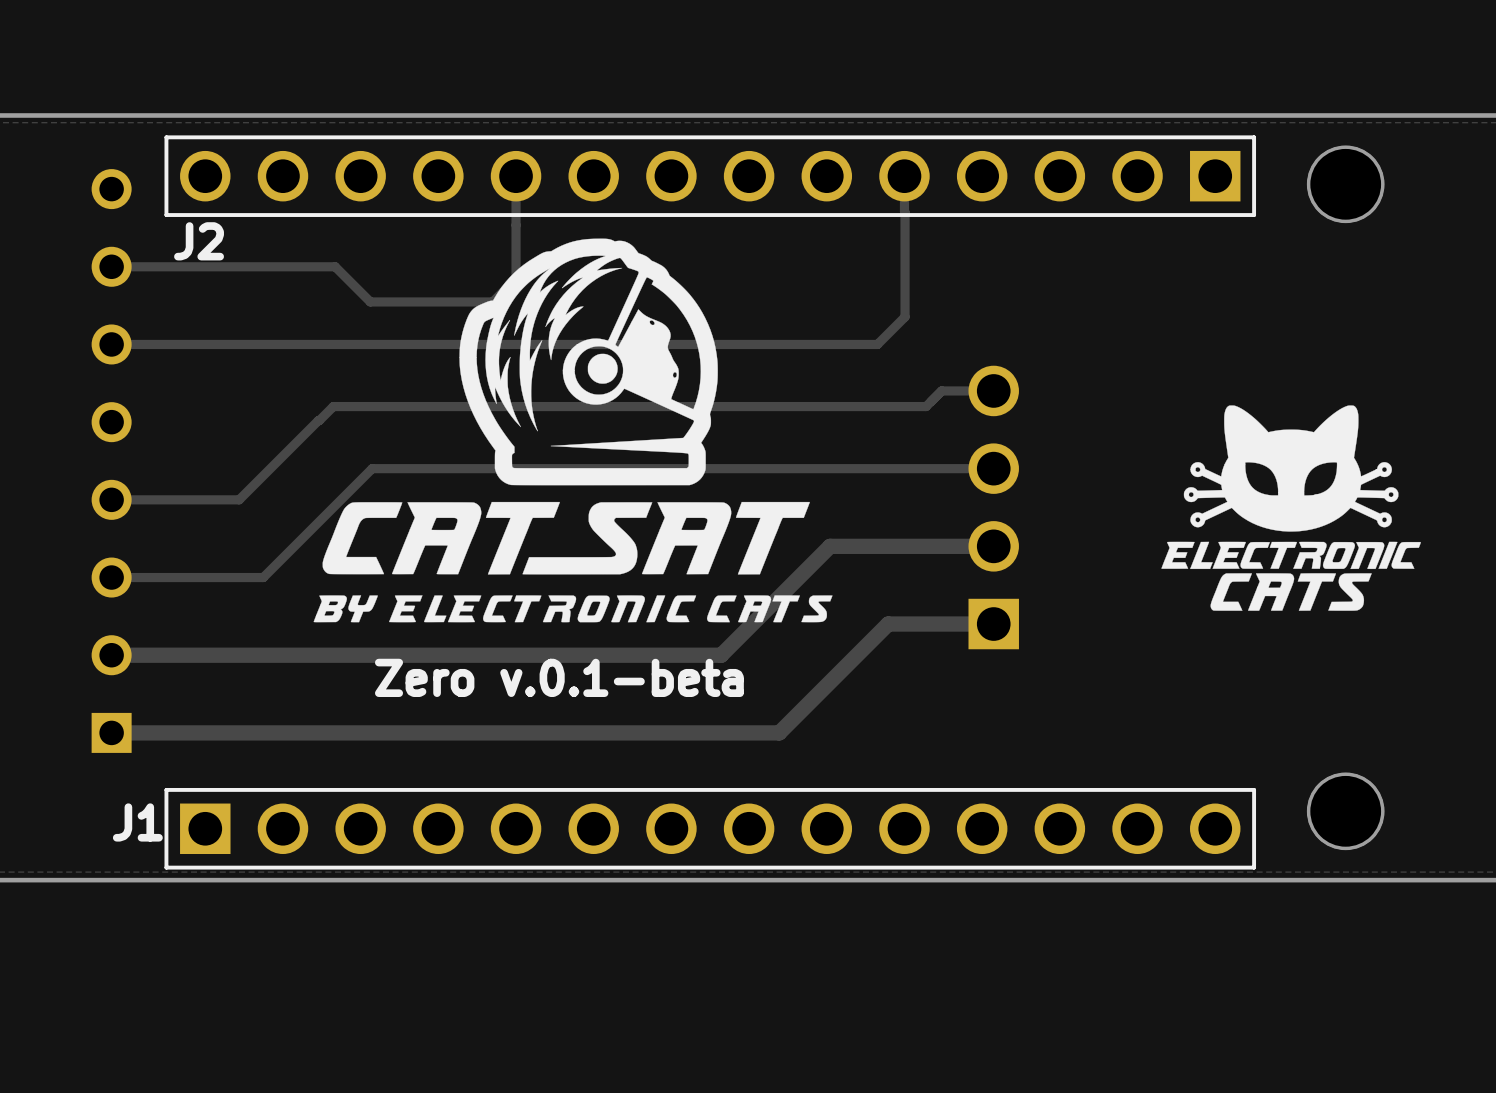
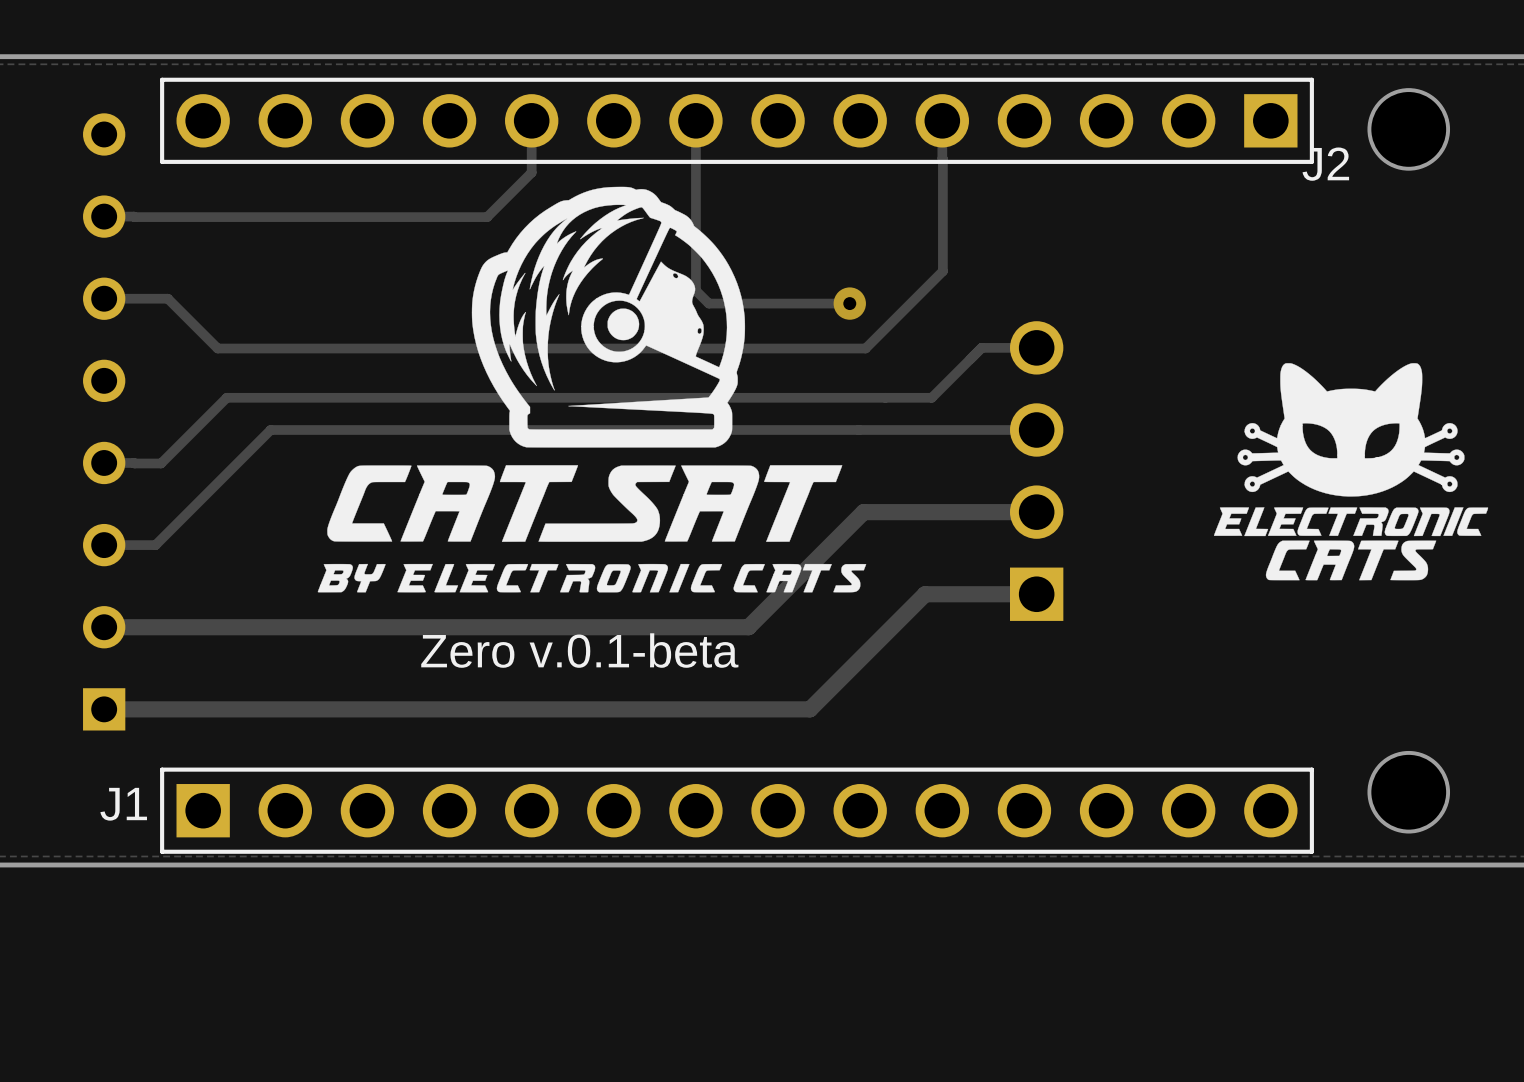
track: none -> (695, 120) (695, 290) (708, 303) (849, 303)
track: (516, 225) (516, 278) (492, 301) (370, 301) (335, 266) (139, 266) -> (531, 172) (487, 217) (134, 216)
J2 name position: J2 (199, 241) -> J2 (1325, 164)
track: (905, 316) (877, 344) (171, 344) -> (942, 269) (865, 348) (217, 348) (167, 298)
via: none -> (849, 303)
track: (926, 406) (333, 406) (239, 499) (139, 499) -> (965, 364) (931, 397) (226, 397) (161, 463) (134, 462)
track: (372, 468) (263, 577) (160, 577) -> (379, 429) (270, 429) (155, 545)

